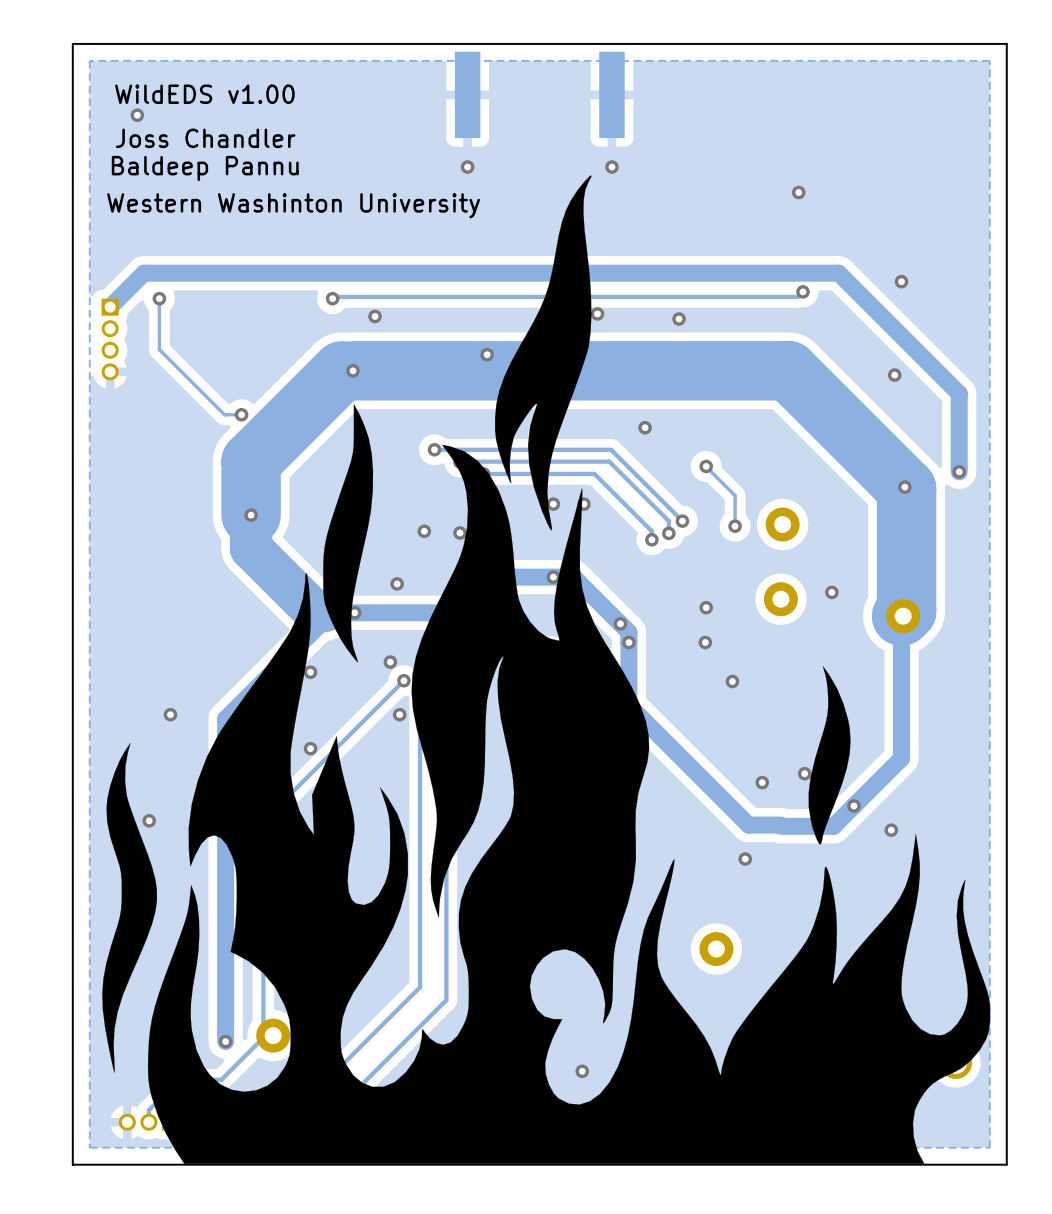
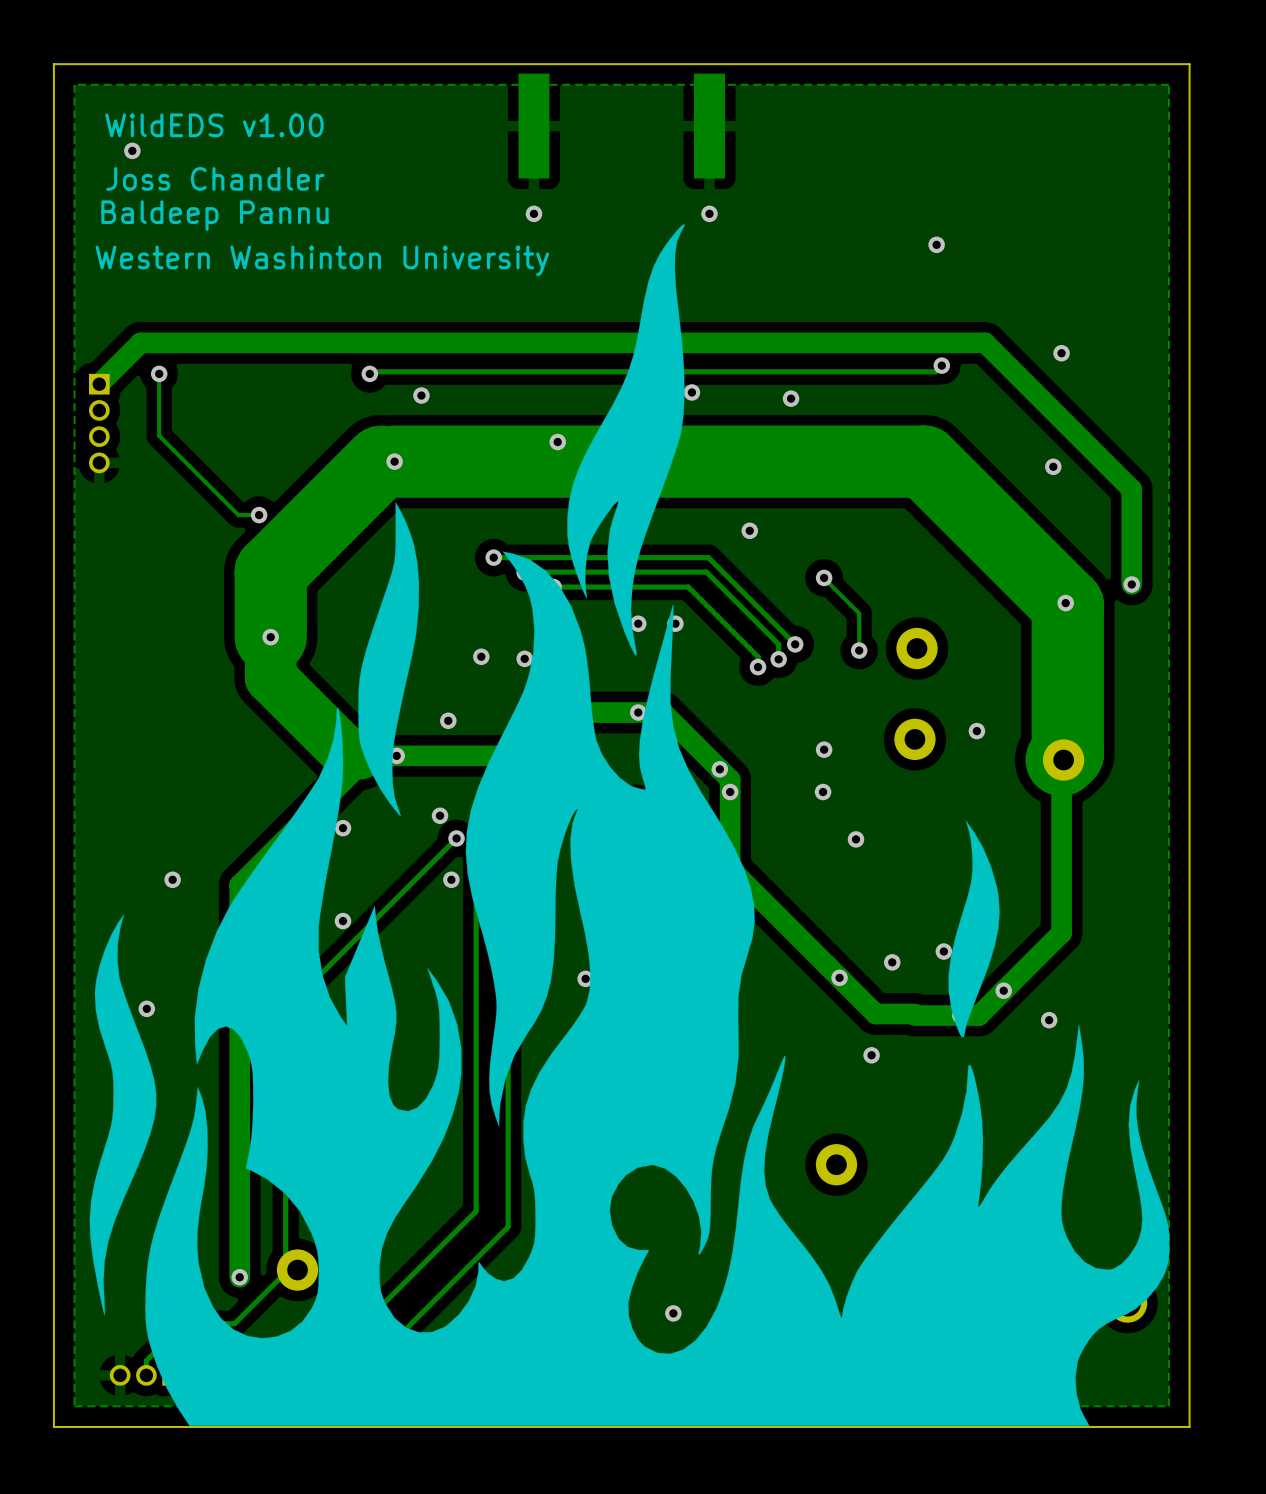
via: none -> (839, 977)
via: none -> (585, 978)

